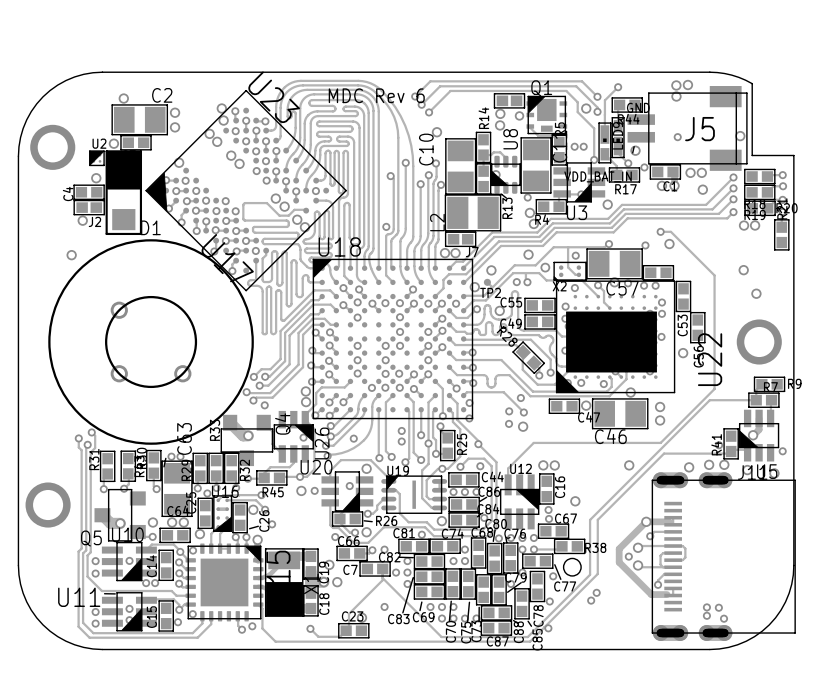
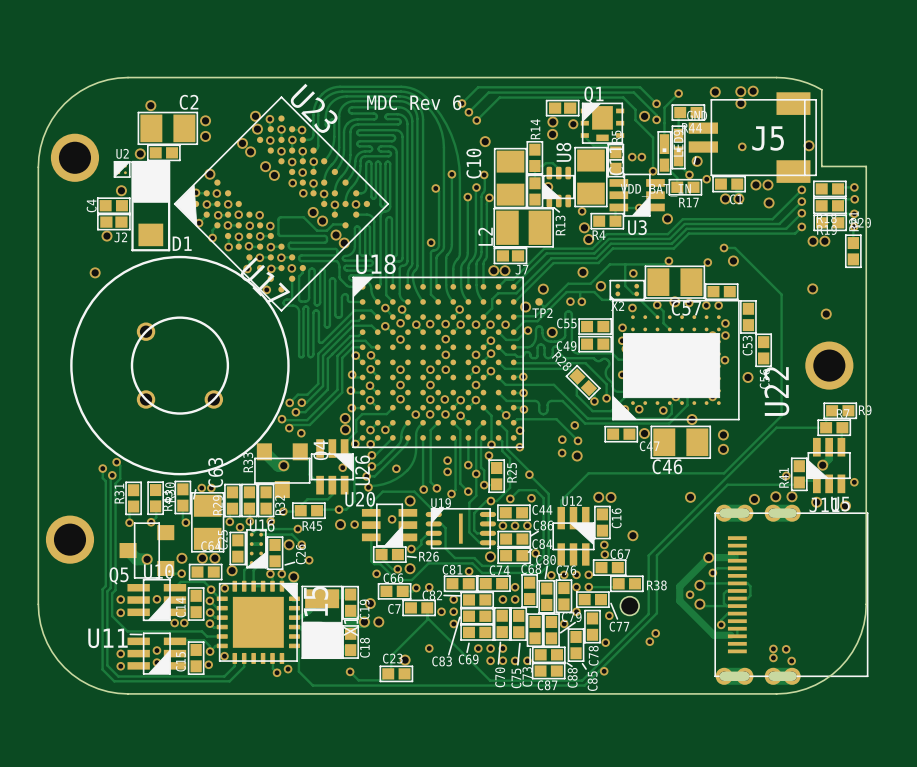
via: none -> (715, 92)

